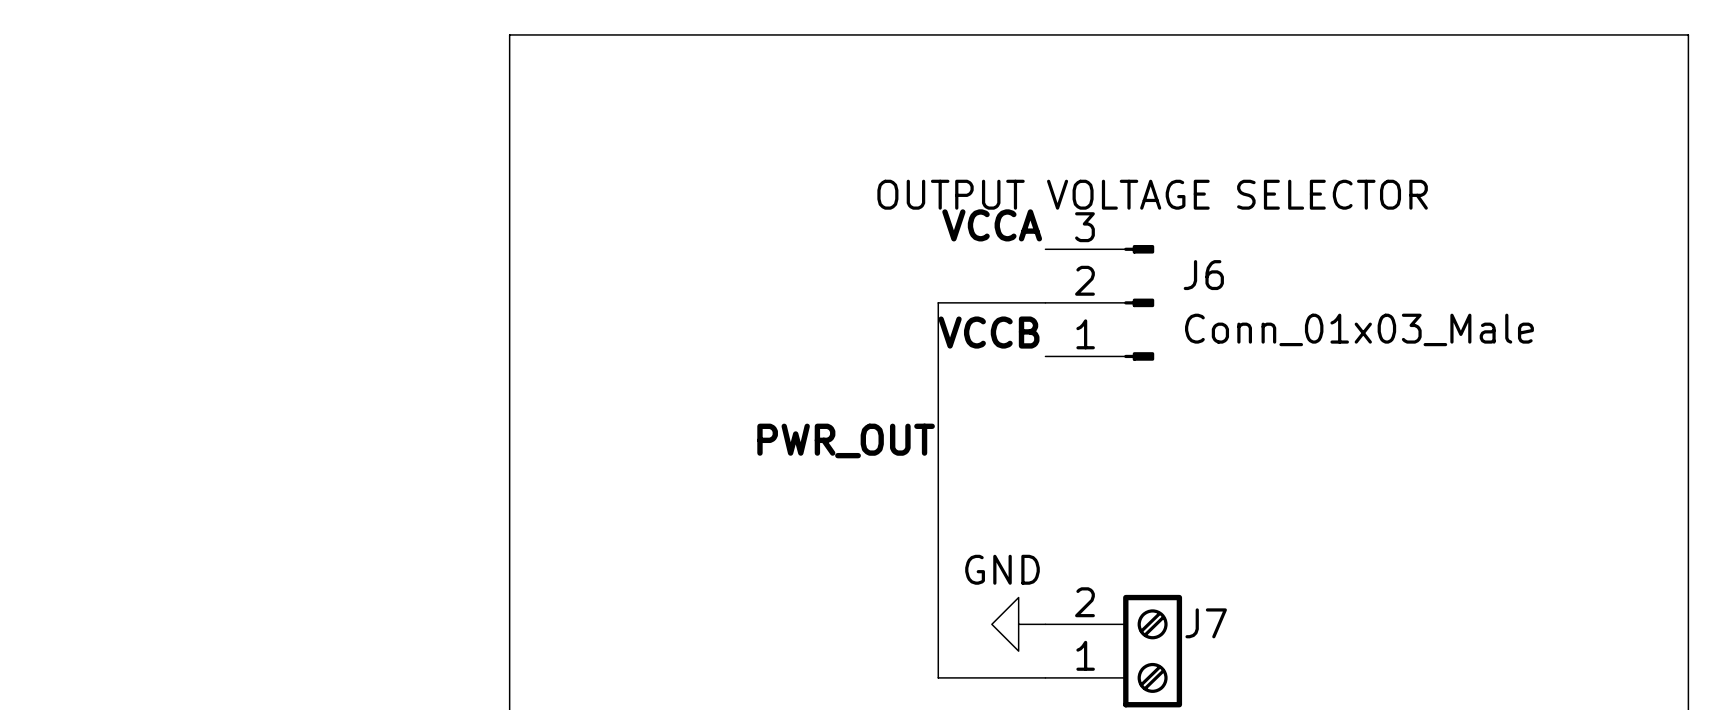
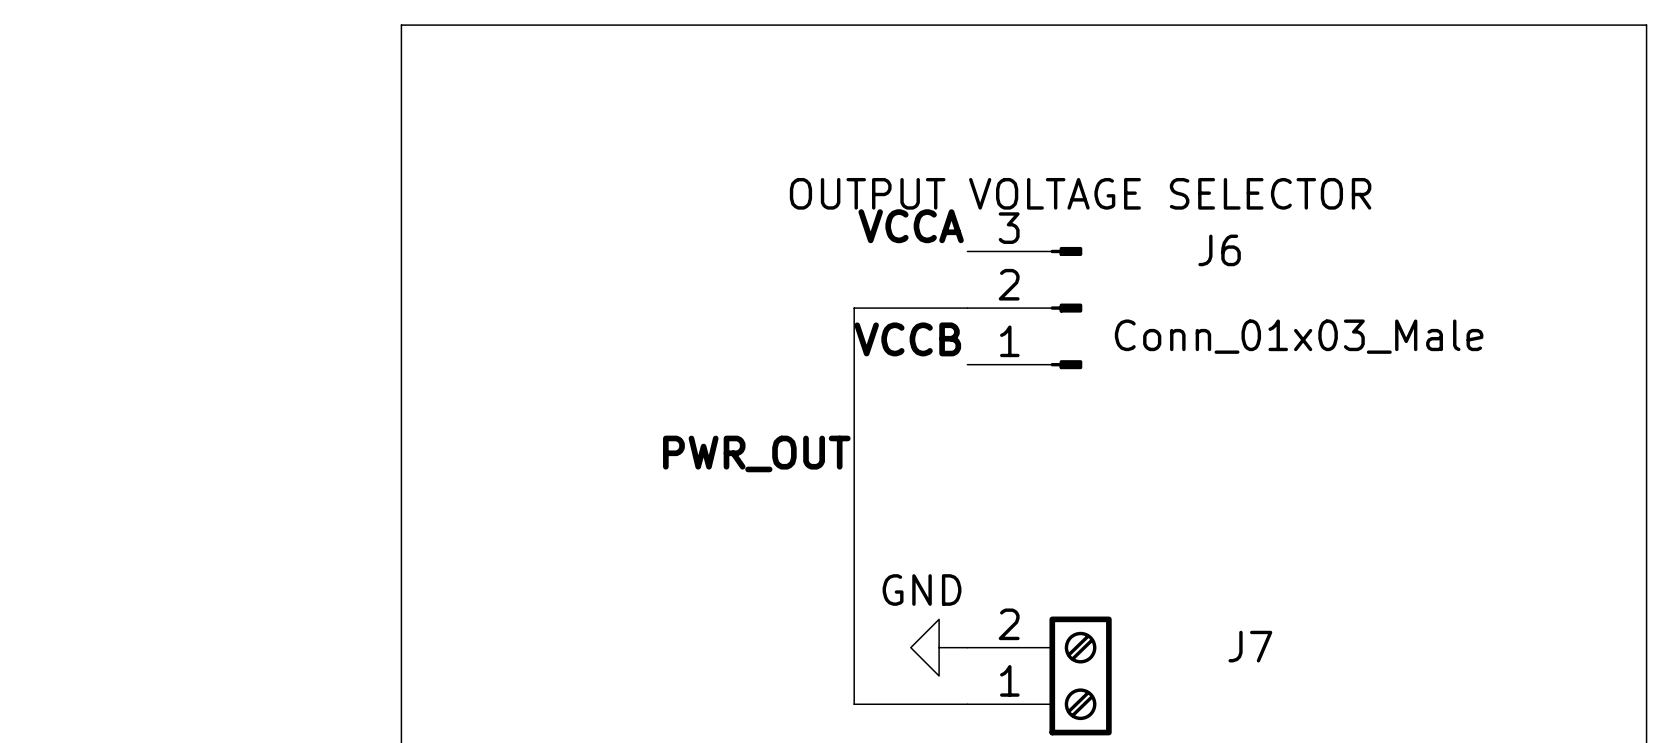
J6 name position: J6 (1203, 275) -> J6 (1219, 250)
J7 name position: J7 (1206, 623) -> J7 (1250, 646)

